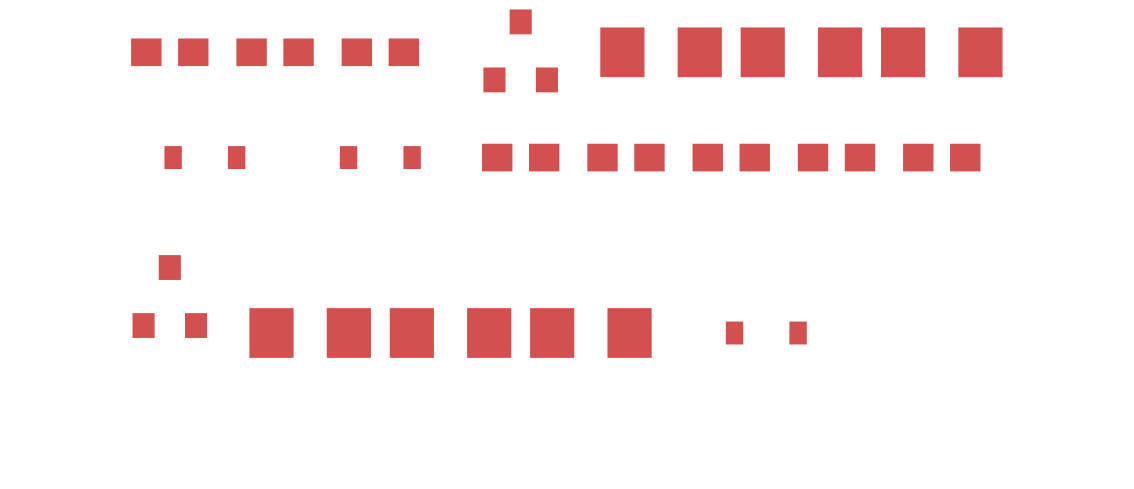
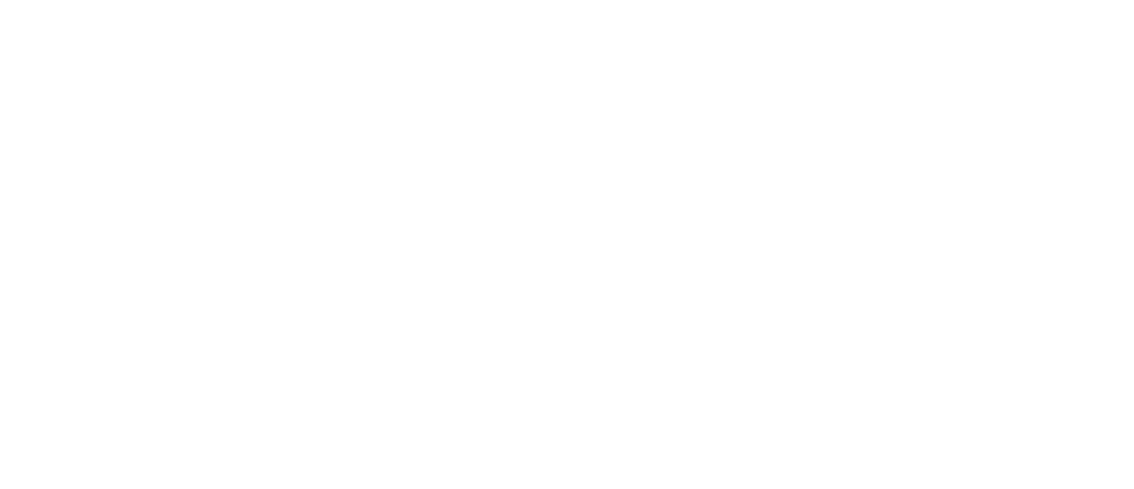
part: (520, 50) -> none
part: (169, 52) -> none
part: (275, 52) -> none
part: (380, 52) -> none
part: (661, 52) -> none
part: (801, 52) -> none
part: (941, 52) -> none
part: (204, 157) -> none
part: (380, 157) -> none
part: (520, 157) -> none
part: (625, 157) -> none
part: (731, 157) -> none
part: (836, 157) -> none
part: (941, 157) -> none
part: (169, 296) -> none
part: (310, 333) -> none
part: (450, 333) -> none
part: (590, 333) -> none
part: (766, 333) -> none

